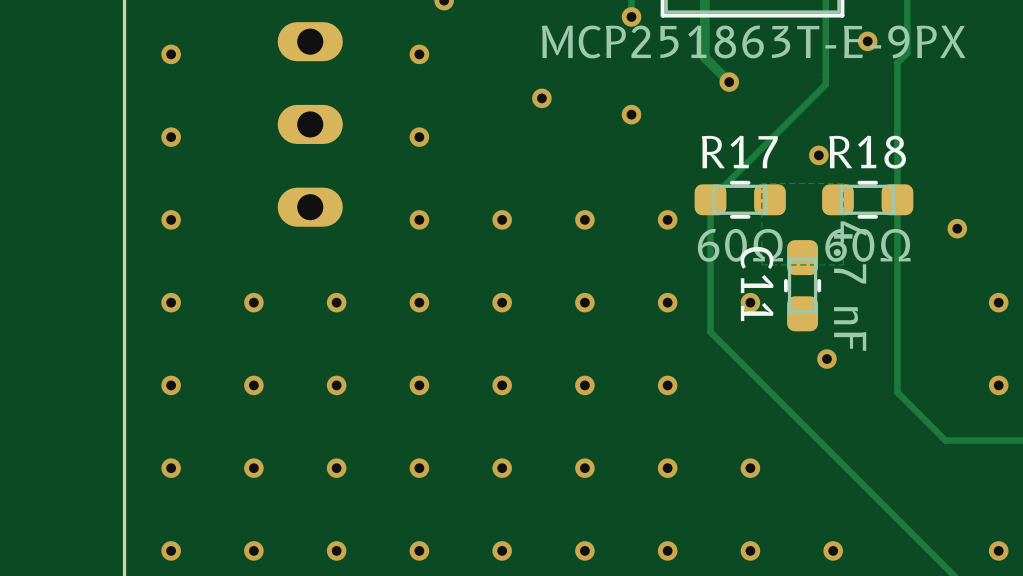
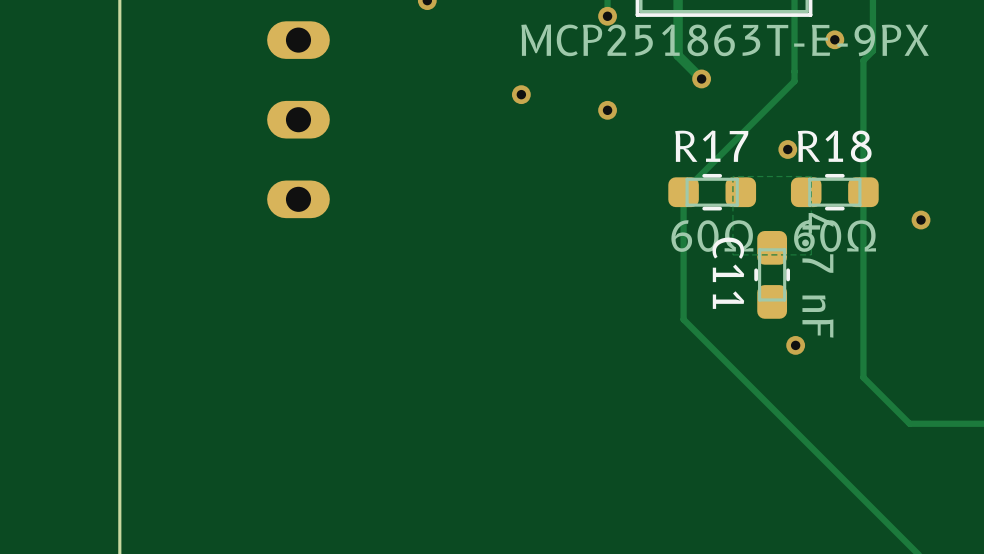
via: (171, 54) -> none
via: (419, 54) -> none
via: (171, 137) -> none
via: (419, 137) -> none
via: (171, 219) -> none
via: (419, 219) -> none
via: (502, 219) -> none
via: (584, 219) -> none
via: (667, 219) -> none
via: (171, 302) -> none
via: (253, 302) -> none
via: (336, 302) -> none
via: (419, 302) -> none
via: (502, 302) -> none
via: (584, 302) -> none
via: (667, 302) -> none
via: (750, 302) -> none
via: (998, 302) -> none
via: (171, 385) -> none
via: (253, 385) -> none
via: (336, 385) -> none
via: (419, 385) -> none
via: (502, 385) -> none
via: (584, 385) -> none
via: (667, 385) -> none
via: (998, 385) -> none
via: (171, 468) -> none
via: (253, 468) -> none
via: (336, 468) -> none
via: (419, 468) -> none
via: (502, 468) -> none
via: (584, 468) -> none
via: (667, 468) -> none
via: (750, 468) -> none
via: (171, 550) -> none
via: (253, 550) -> none
via: (336, 550) -> none
via: (419, 550) -> none
via: (502, 550) -> none
via: (584, 550) -> none
via: (667, 550) -> none
via: (750, 550) -> none
via: (833, 550) -> none
via: (998, 550) -> none

